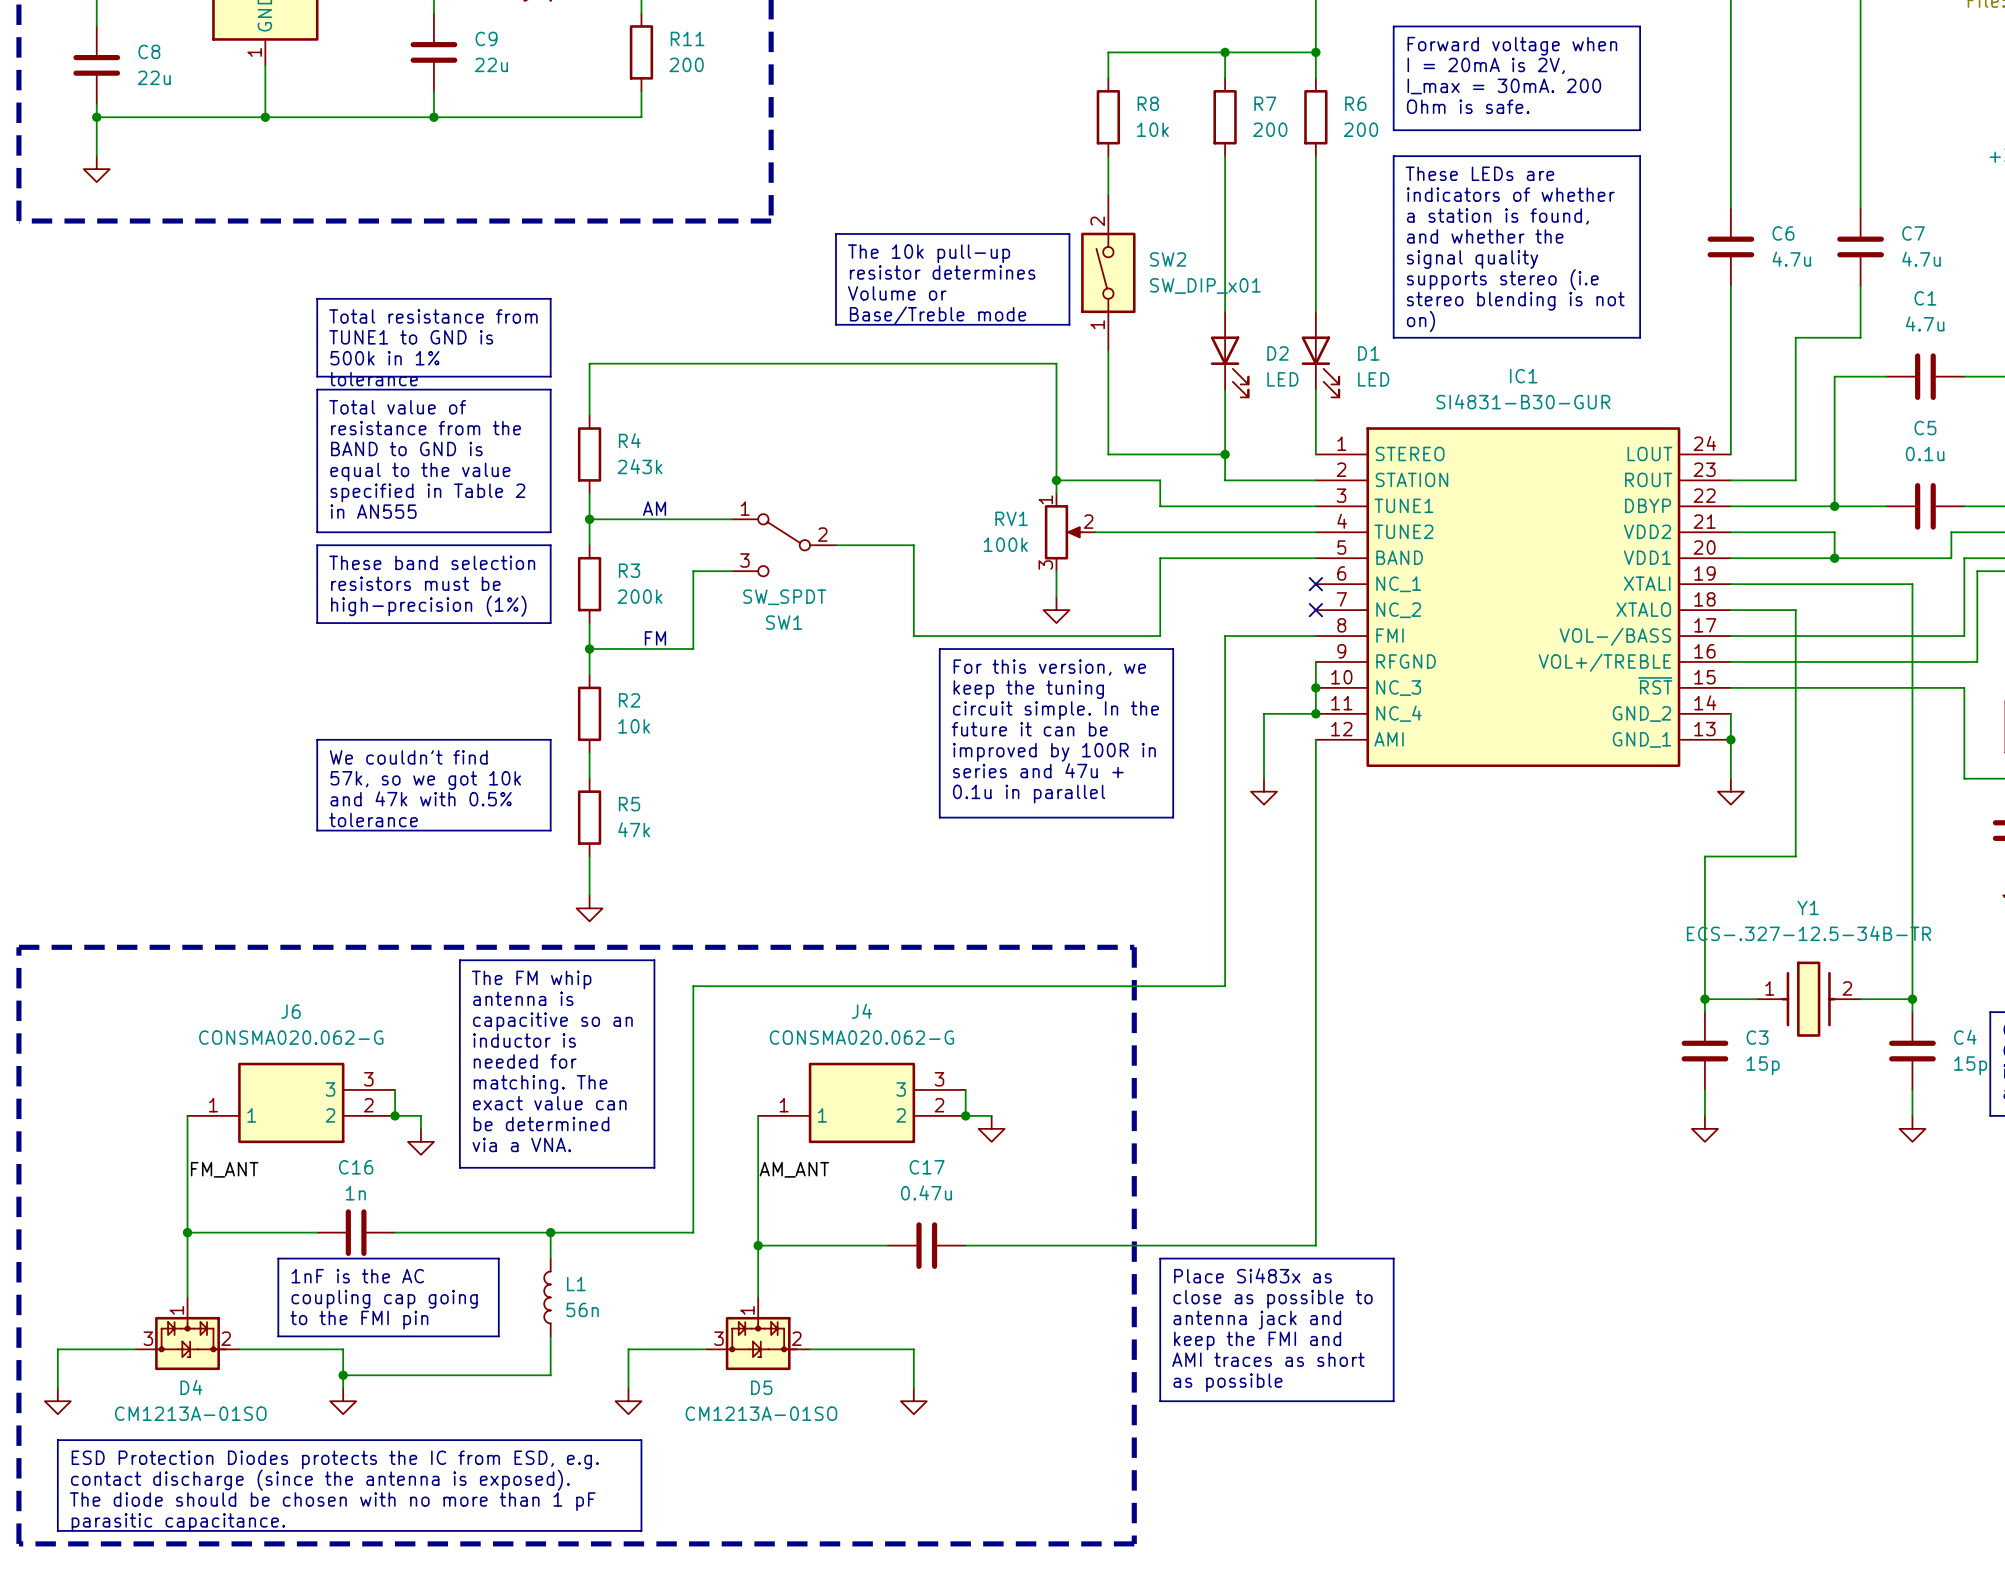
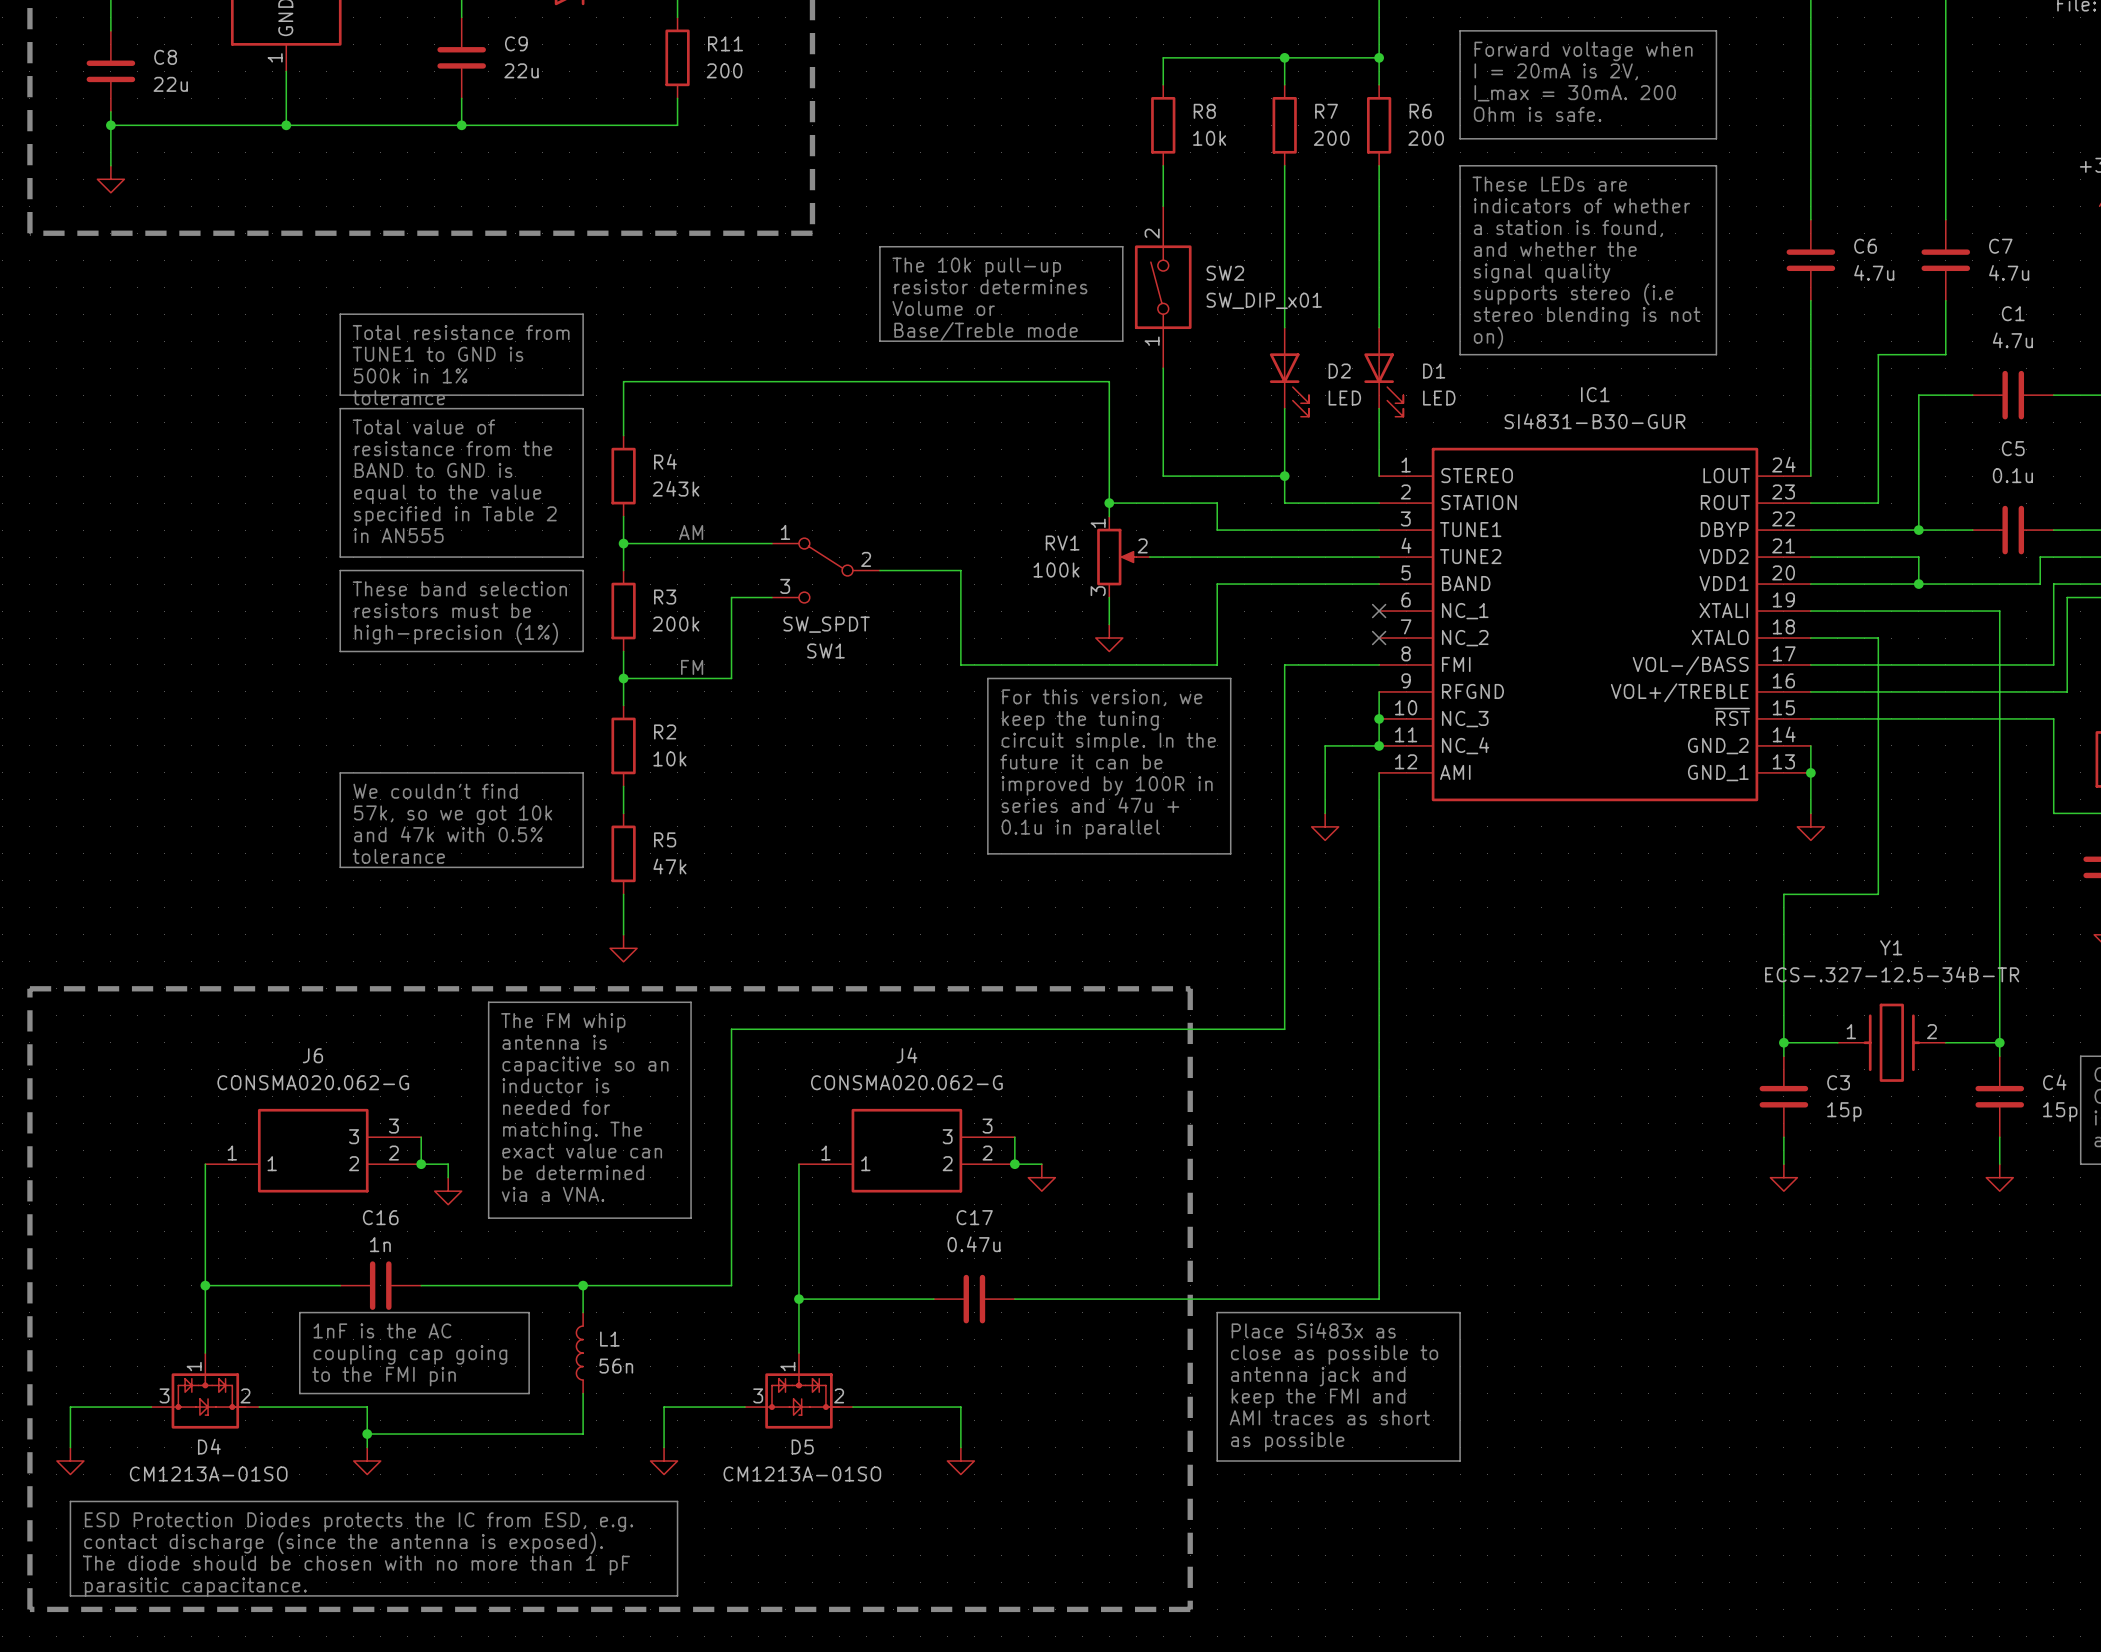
label: FM_ANT (224, 1169) -> none
label: AM_ANT (794, 1169) -> none

